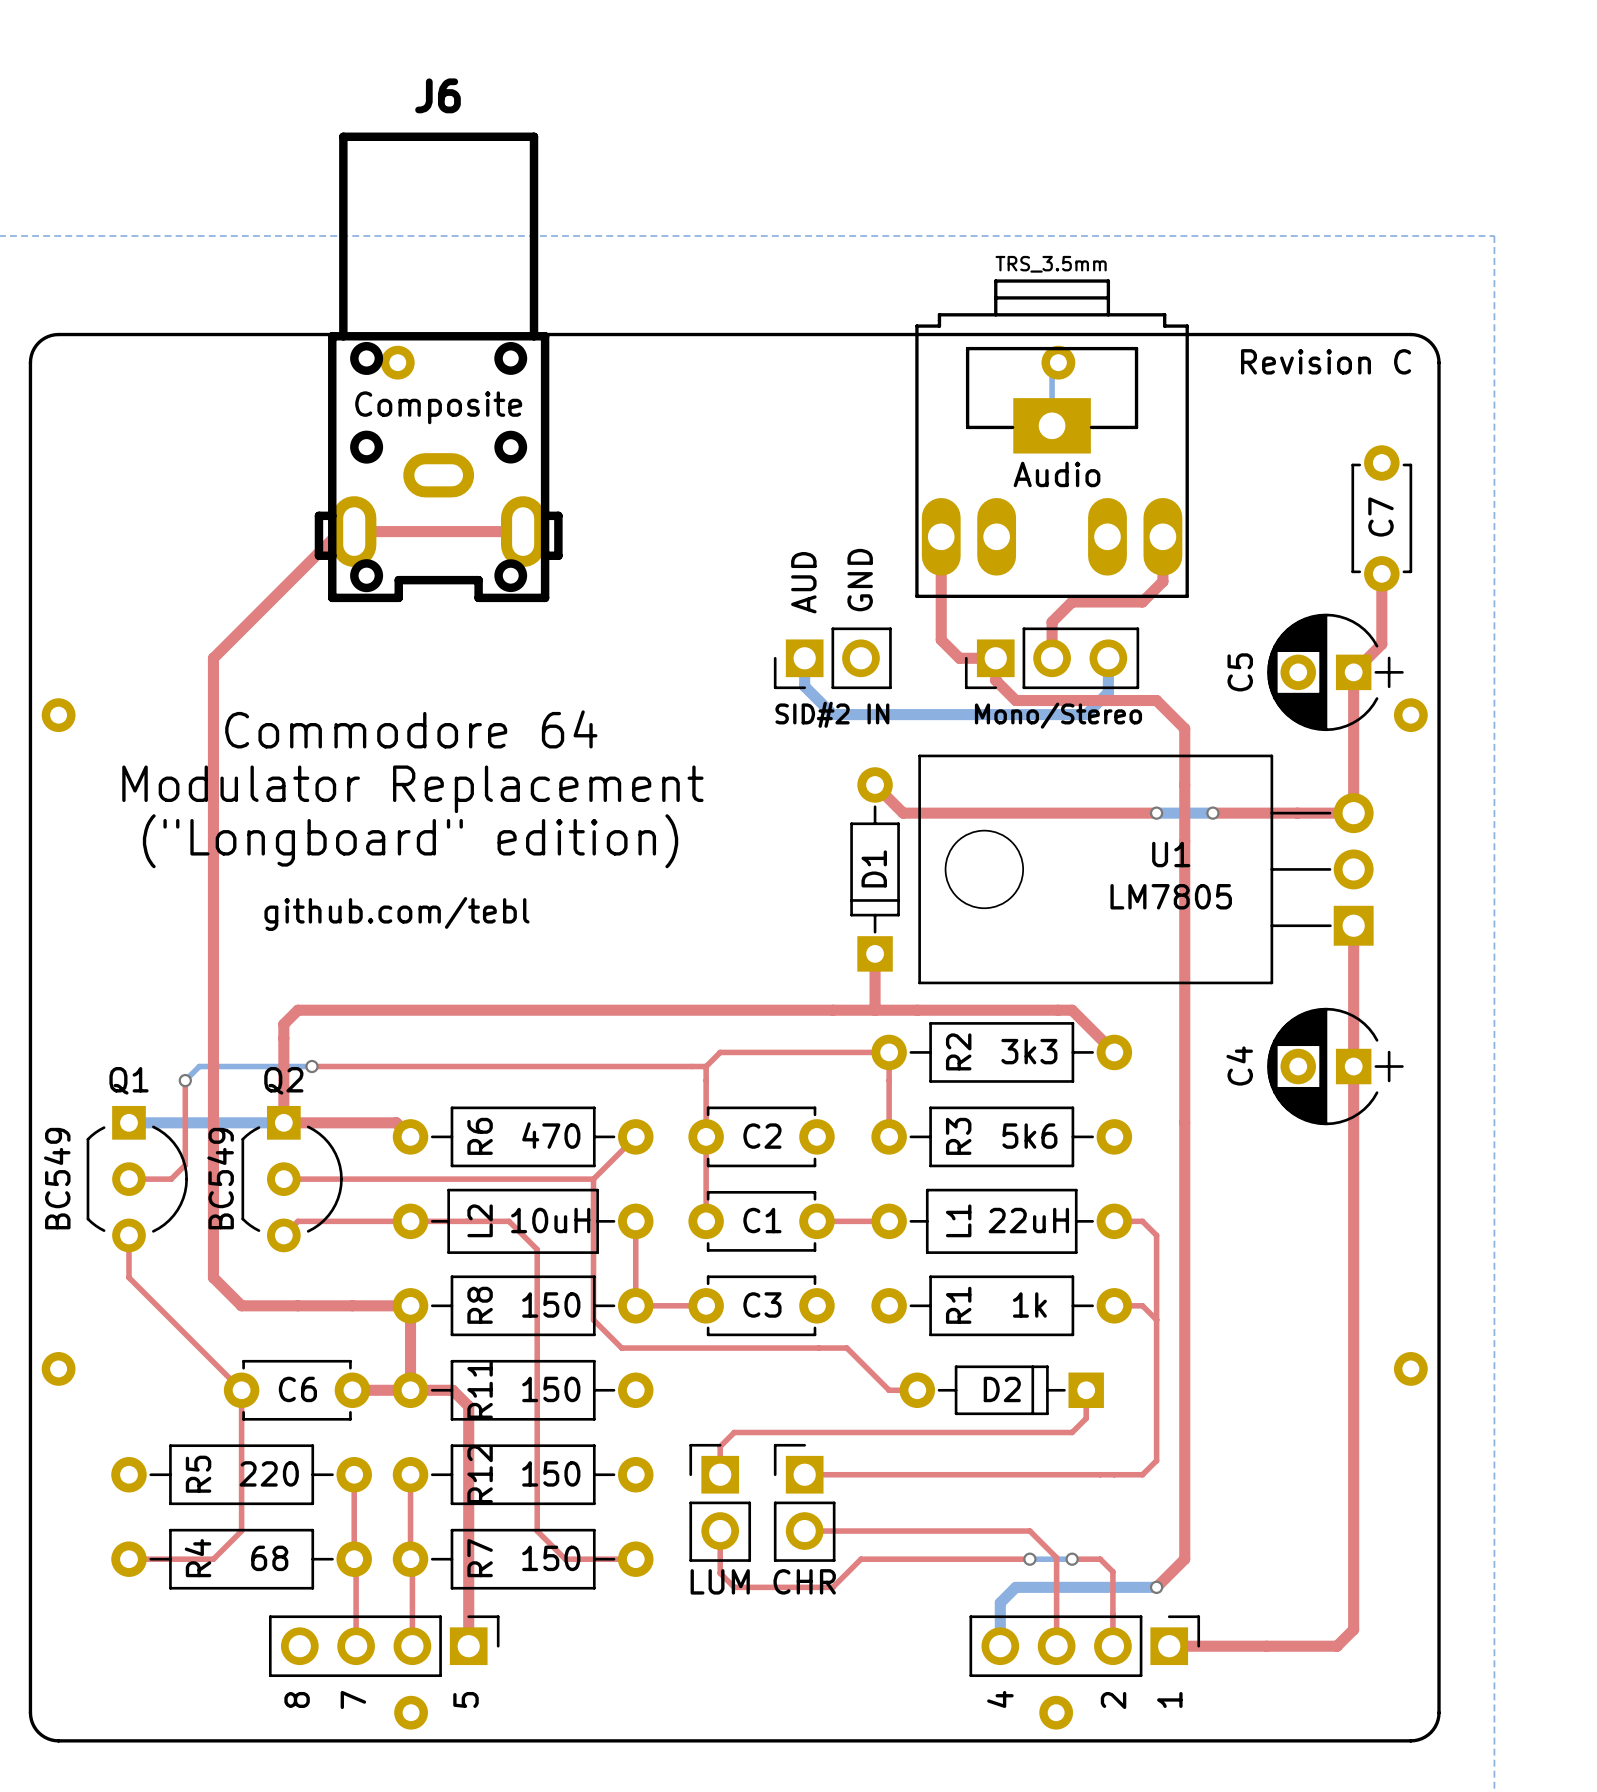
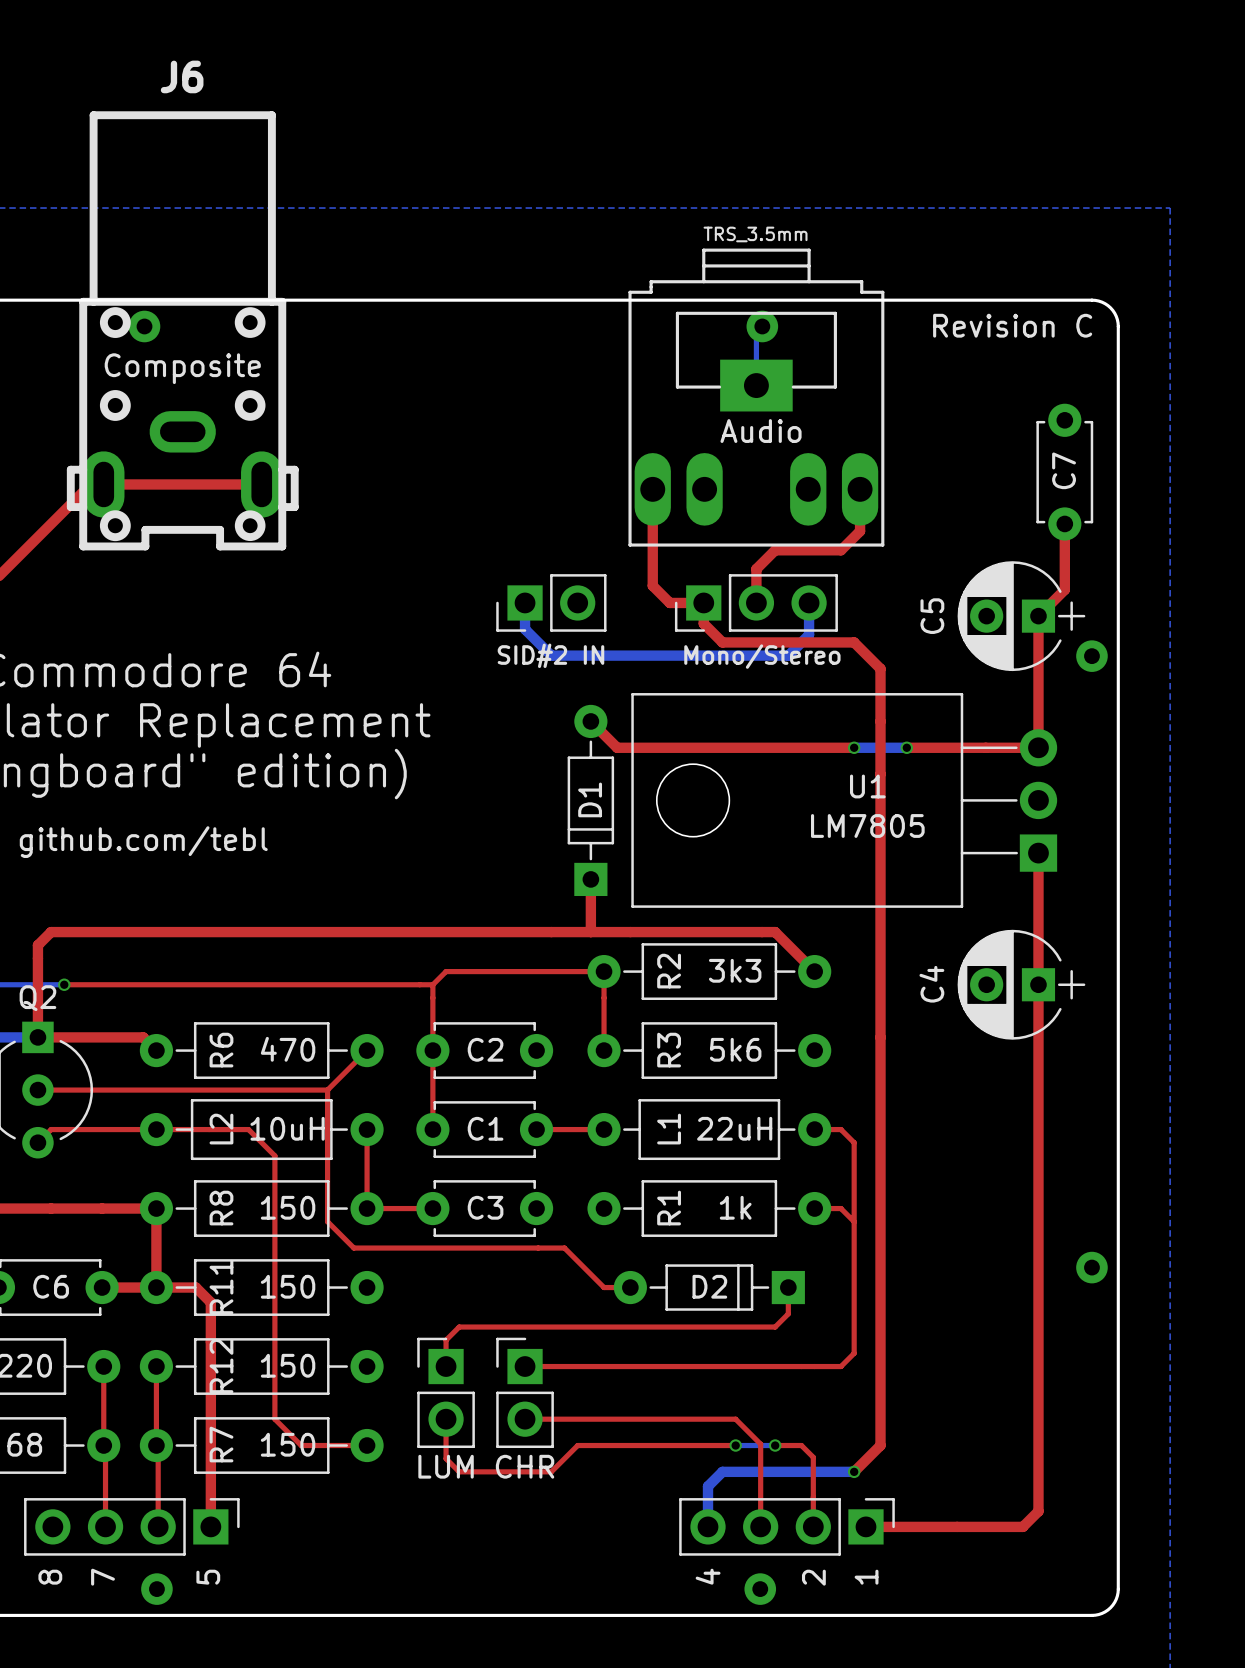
text: GND (860, 580) -> none
text: AUD (803, 582) -> none

